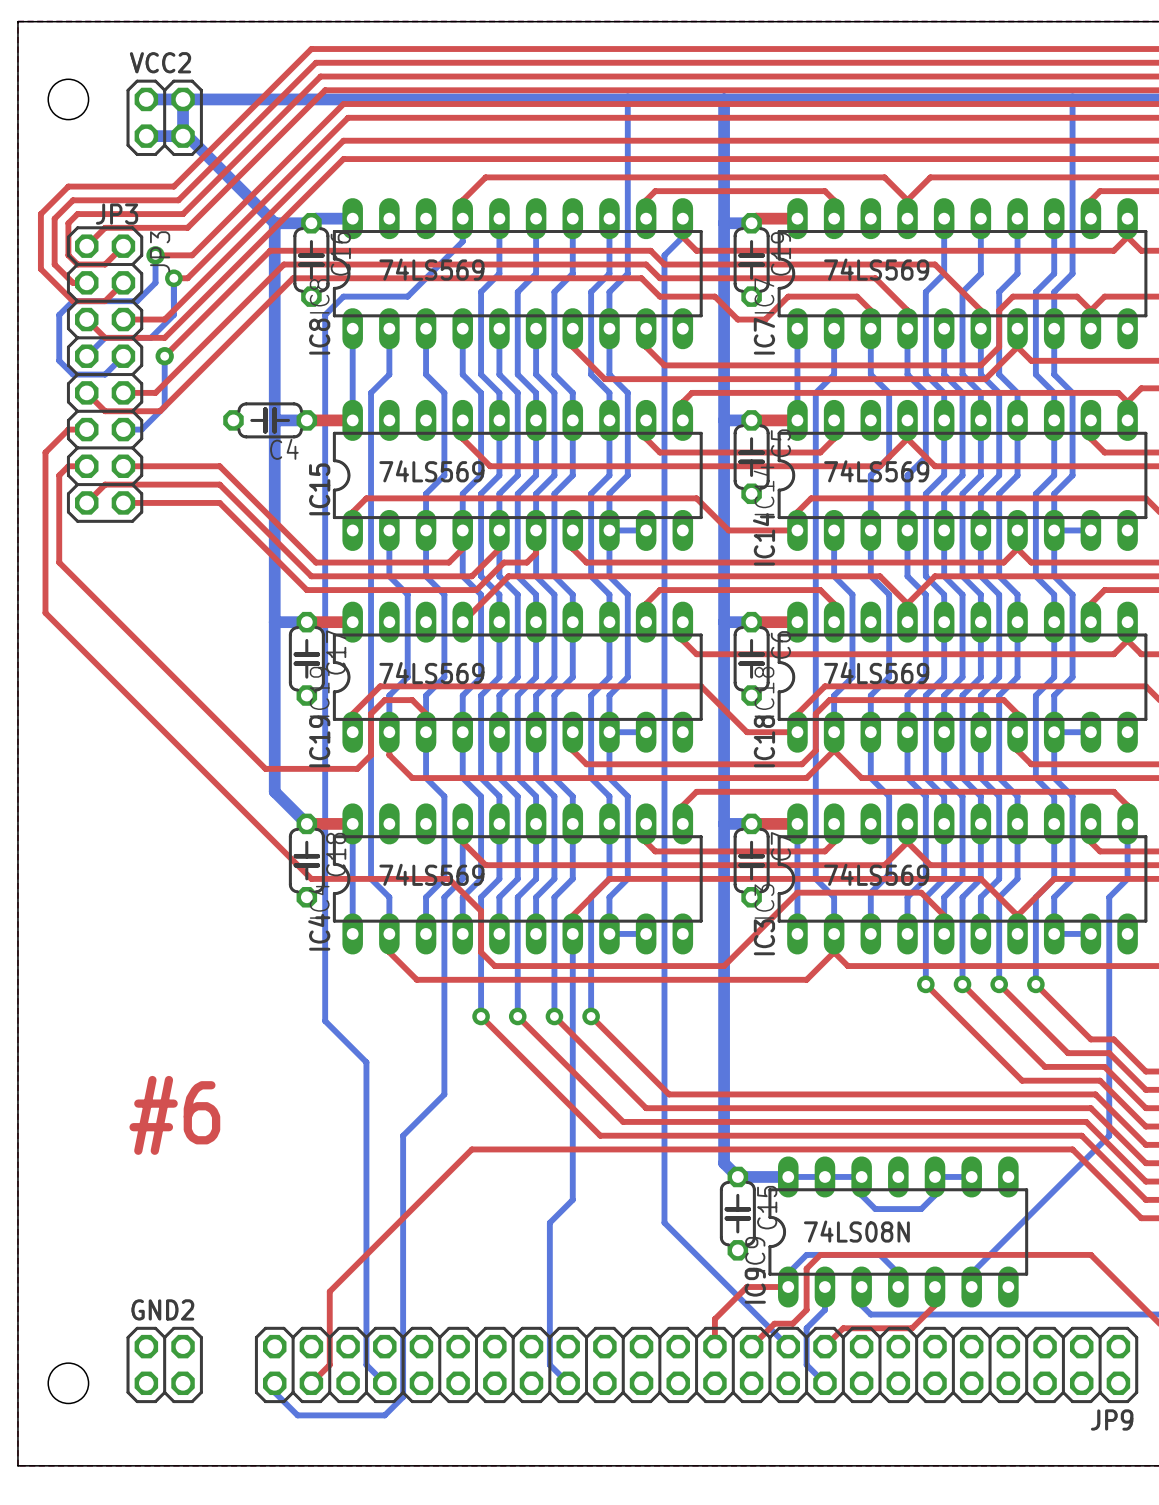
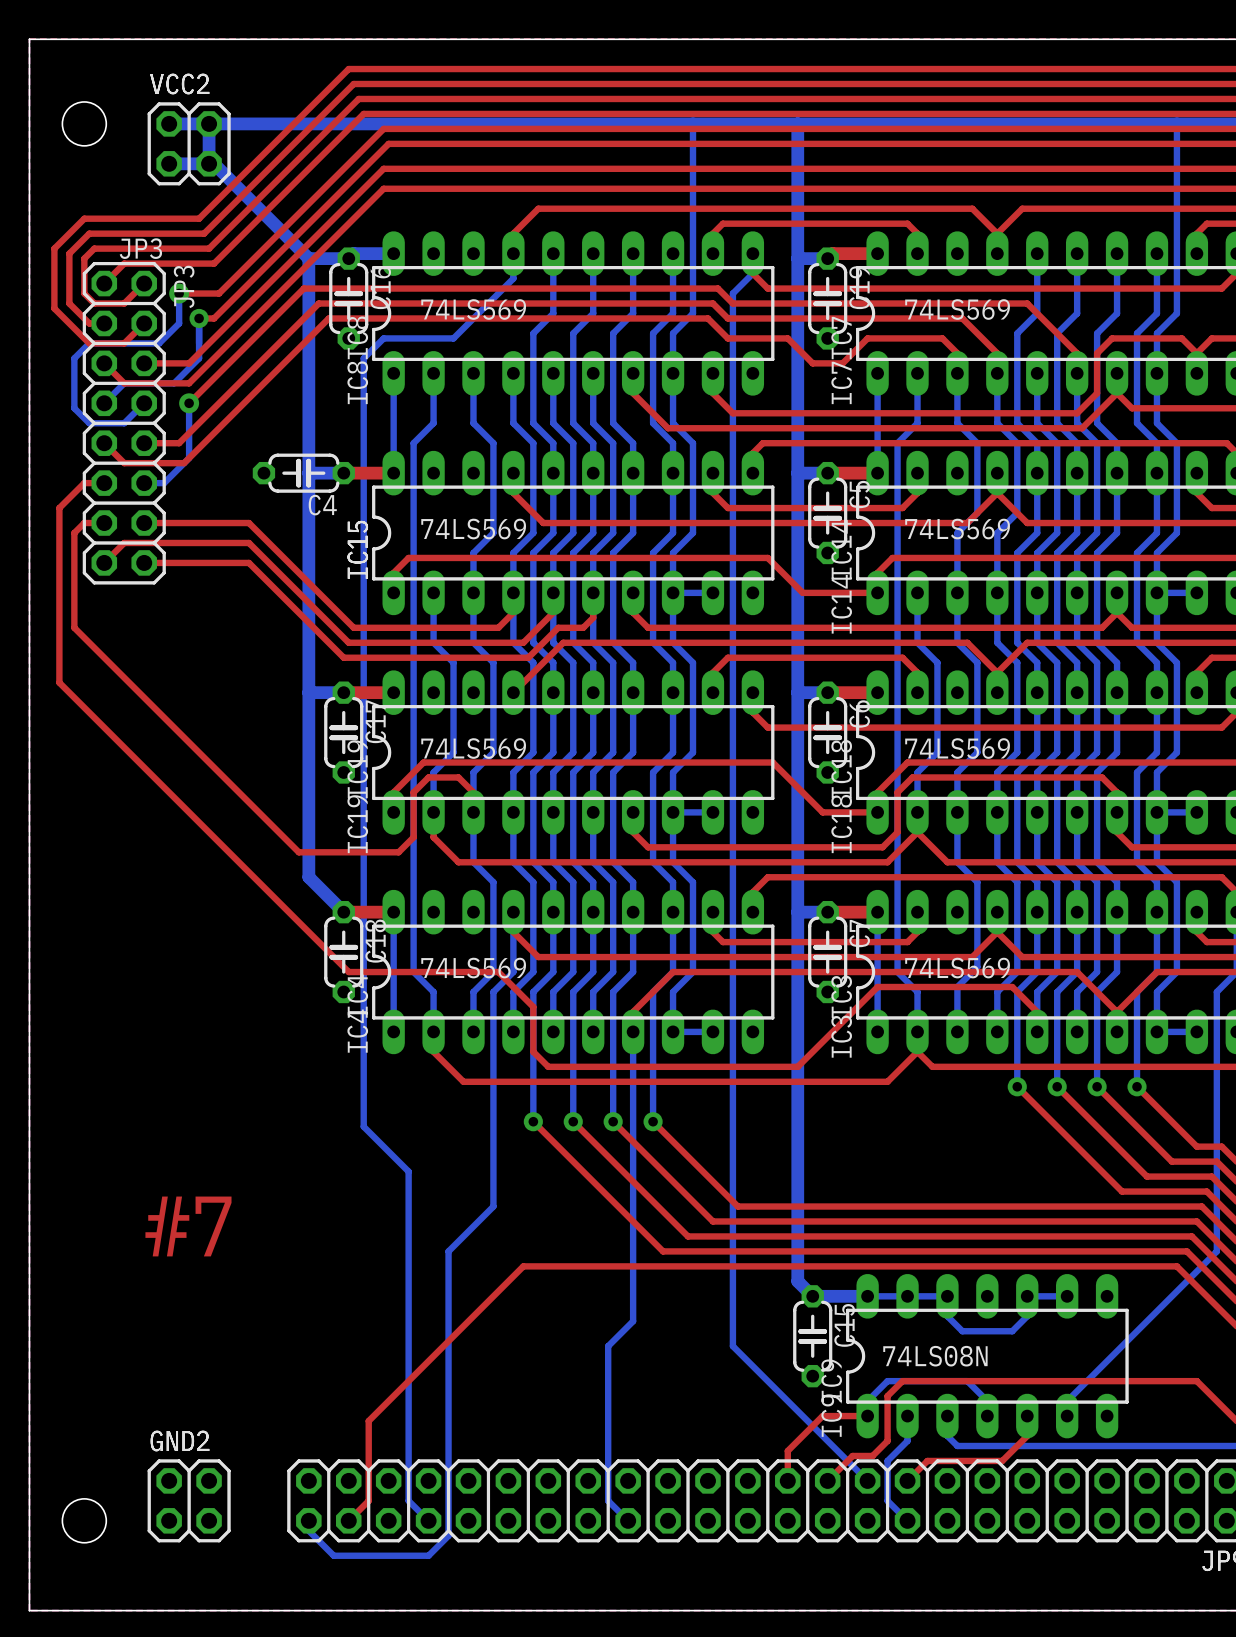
text: #6 (174, 1115) -> #7 (188, 1226)

